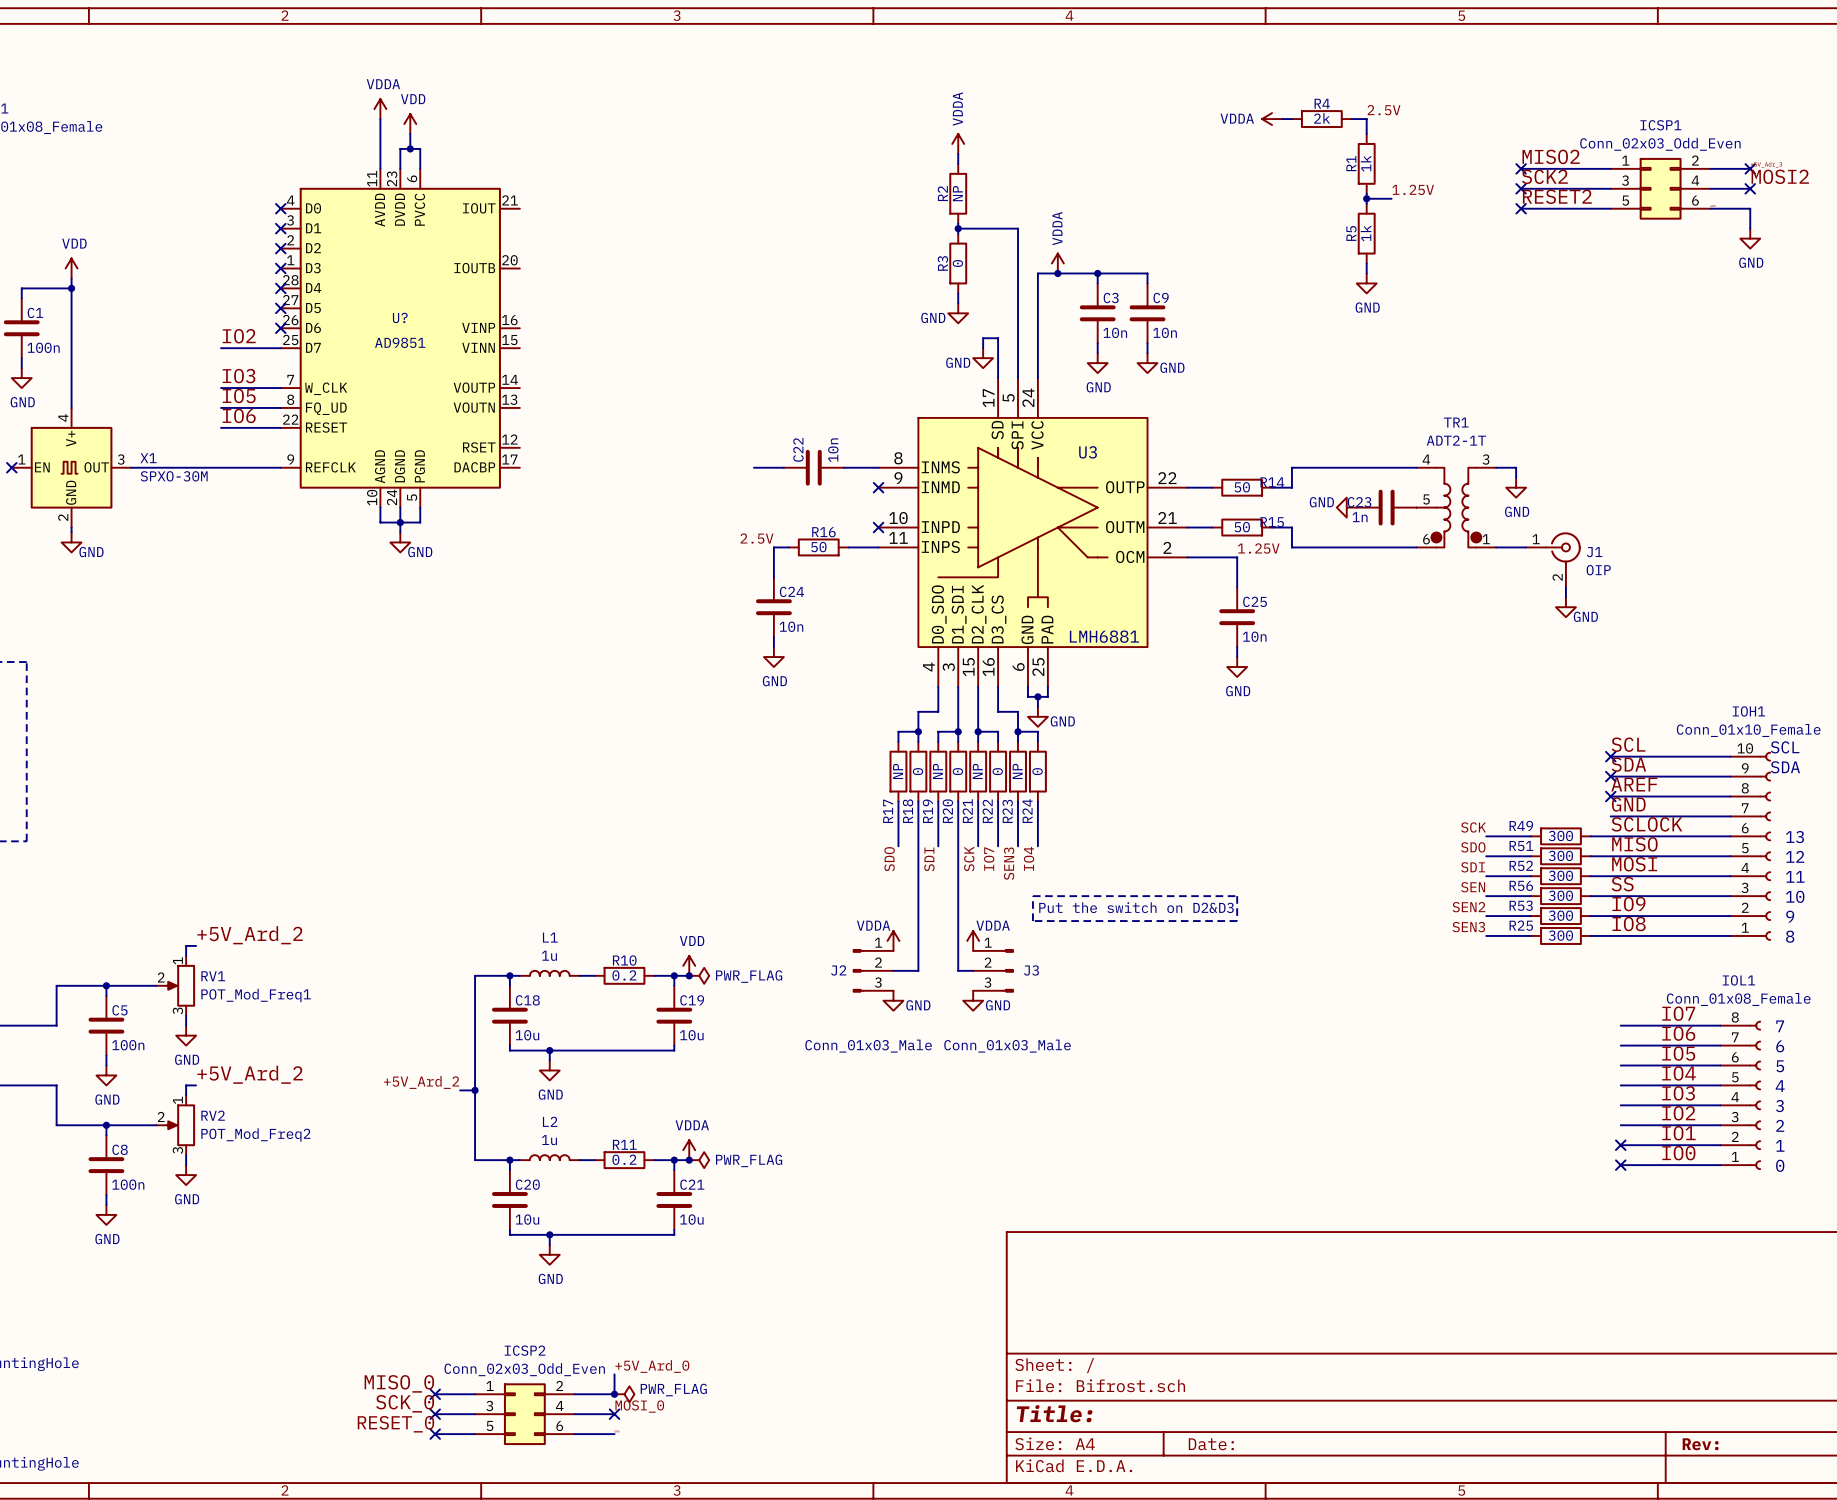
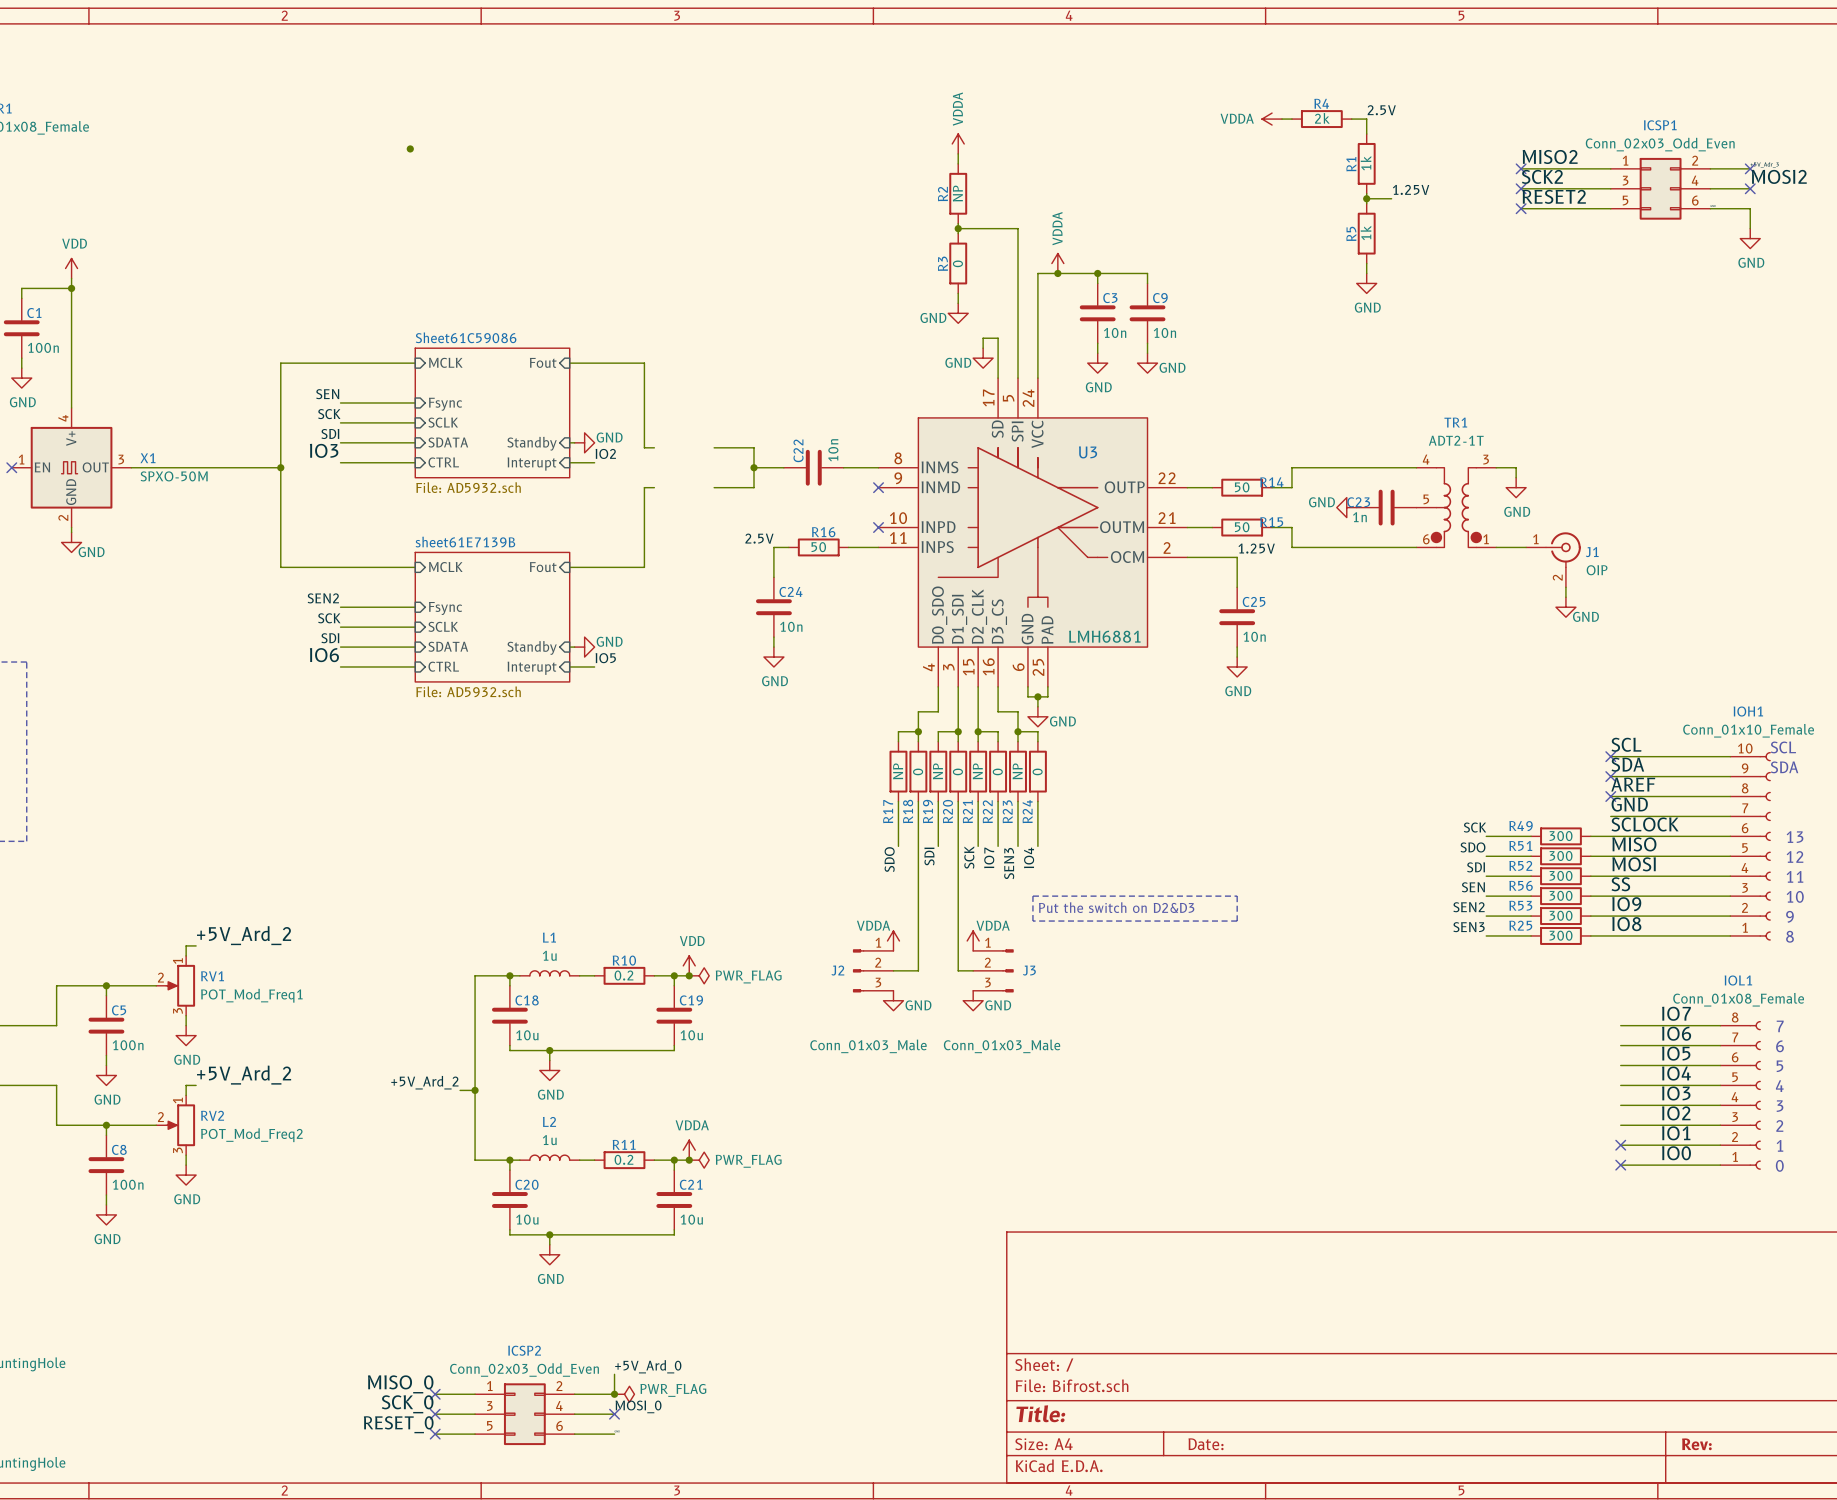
power symbol: VDDA (380, 109) -> none
wire: (380, 119) (380, 168) -> none
power symbol: VDD (410, 124) -> none
wire: (410, 134) (410, 148) -> none
wire: (400, 168) (400, 148) (420, 148) (420, 168) -> none
no-connect mark: (280, 208) -> none
no-connect mark: (280, 228) -> none
no-connect mark: (280, 248) -> none
no-connect mark: (280, 268) -> none
no-connect mark: (280, 288) -> none
no-connect mark: (280, 308) -> none
no-connect mark: (280, 328) -> none
label: IO2 (239, 336) -> none
U?: AD9851 (400, 338) -> none
wire: (221, 348) (280, 348) -> none
sheet pin: none -> MCLK (445, 362)
sheet pin: none -> Fout (543, 362)
wire: none -> (415, 363) (280, 363) (280, 567) (415, 567)
wire: none -> (569, 363) (644, 363) (644, 447) (654, 447)
label position: IO3 (239, 376) -> IO3 (324, 450)
wire: (221, 388) (280, 388) -> none
label: none -> SEN (327, 394)
label: IO5 (239, 396) -> none
sheet pin: none -> Fsync (445, 404)
wire: (221, 407) (280, 407) -> none
sheet Sheet61C59086: none -> File: AD5932.sch (492, 412)
label: none -> SCK (329, 414)
label: IO6 (239, 415) -> none
sheet pin: none -> SCLK (443, 422)
wire: (221, 427) (280, 427) -> none
label: none -> SDI (330, 434)
sheet pin: none -> SDATA (448, 442)
wire: none -> (569, 442) (574, 442)
power symbol: none -> GND (584, 442)
sheet pin: none -> Standby (532, 443)
wire: none -> (714, 447) (754, 447) (754, 487) (714, 487)
label: none -> IO2 (605, 453)
sheet pin: none -> CTRL (443, 462)
wire: none -> (569, 462) (594, 462)
sheet pin: none -> Interupt (532, 464)
junction: none -> (280, 467)
junction: none -> (754, 467)
X1 value: SPXO-30M (174, 476) -> SPXO-50M (174, 476)
wire: none -> (654, 487) (644, 487) (644, 567) (569, 567)
wire: (380, 507) (380, 522) (420, 522) (420, 507) -> none
wire: (400, 507) (400, 532) -> none
junction: (400, 522) -> none
power symbol: GND (400, 542) -> none
sheet pin: none -> MCLK (445, 567)
sheet pin: none -> Fout (543, 567)
label: none -> SEN2 (323, 598)
wire: none -> (340, 607) (415, 607)
sheet pin: none -> Fsync (445, 608)
sheet sheet61E7139B: none -> File: AD5932.sch (492, 617)
label: none -> SCK (329, 618)
sheet pin: none -> SCLK (443, 626)
wire: none -> (340, 627) (415, 627)
label: none -> SDI (330, 638)
sheet pin: none -> SDATA (448, 646)
wire: none -> (340, 647) (415, 647)
sheet pin: none -> Standby (532, 647)
wire: none -> (569, 647) (574, 647)
power symbol: none -> GND (584, 647)
label: none -> IO6 (324, 655)
label: none -> IO5 (605, 658)
sheet pin: none -> CTRL (443, 666)
wire: none -> (340, 667) (415, 667)
wire: none -> (569, 667) (594, 667)
sheet pin: none -> Interupt (532, 668)

